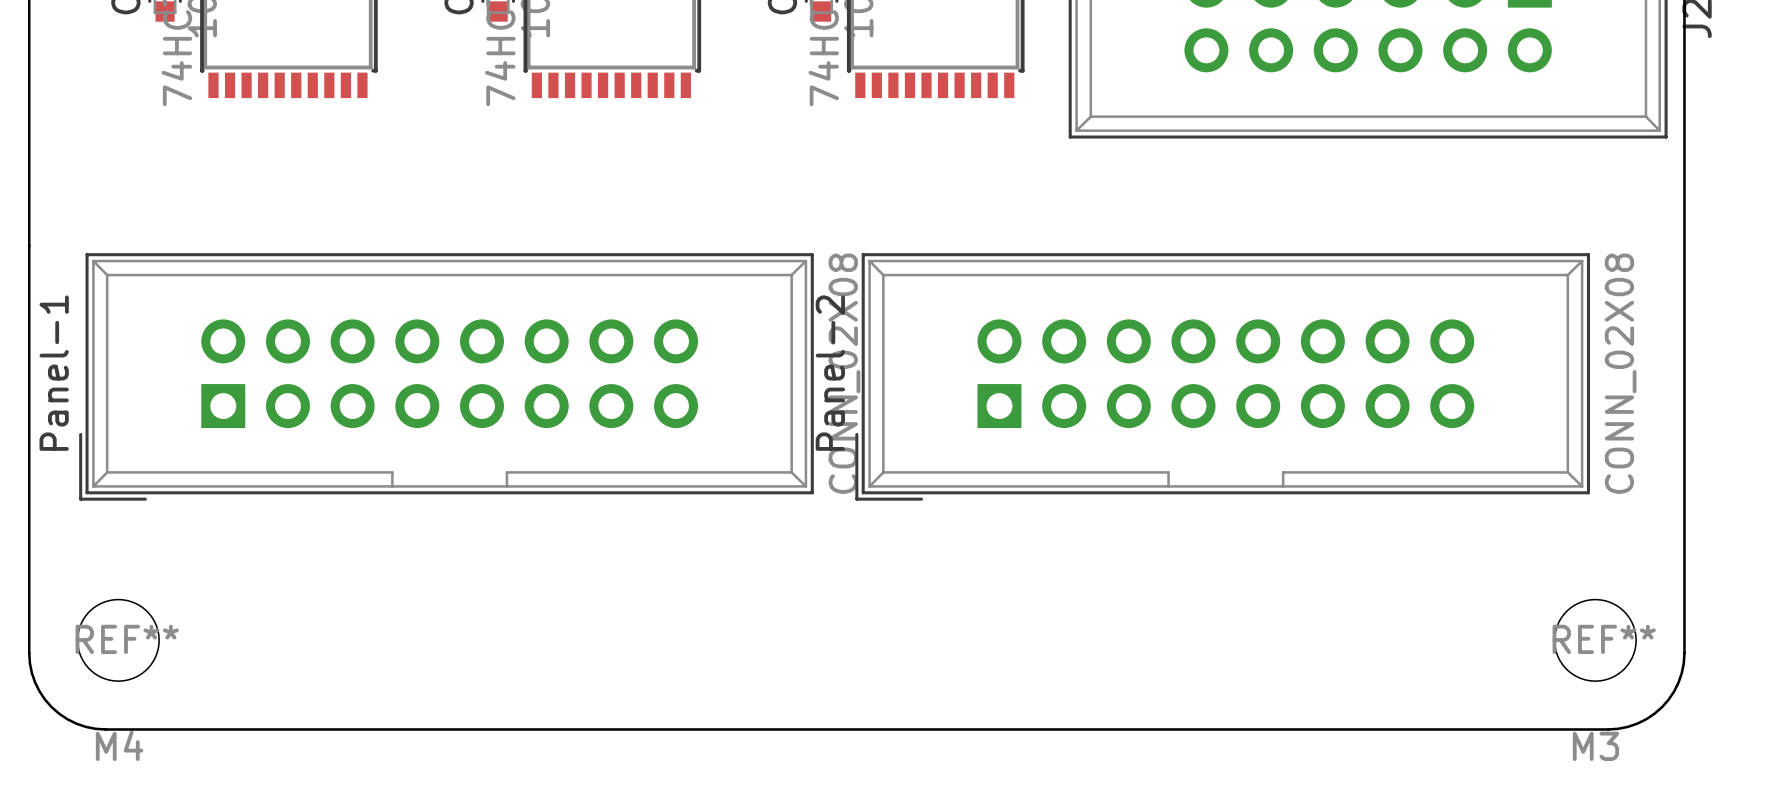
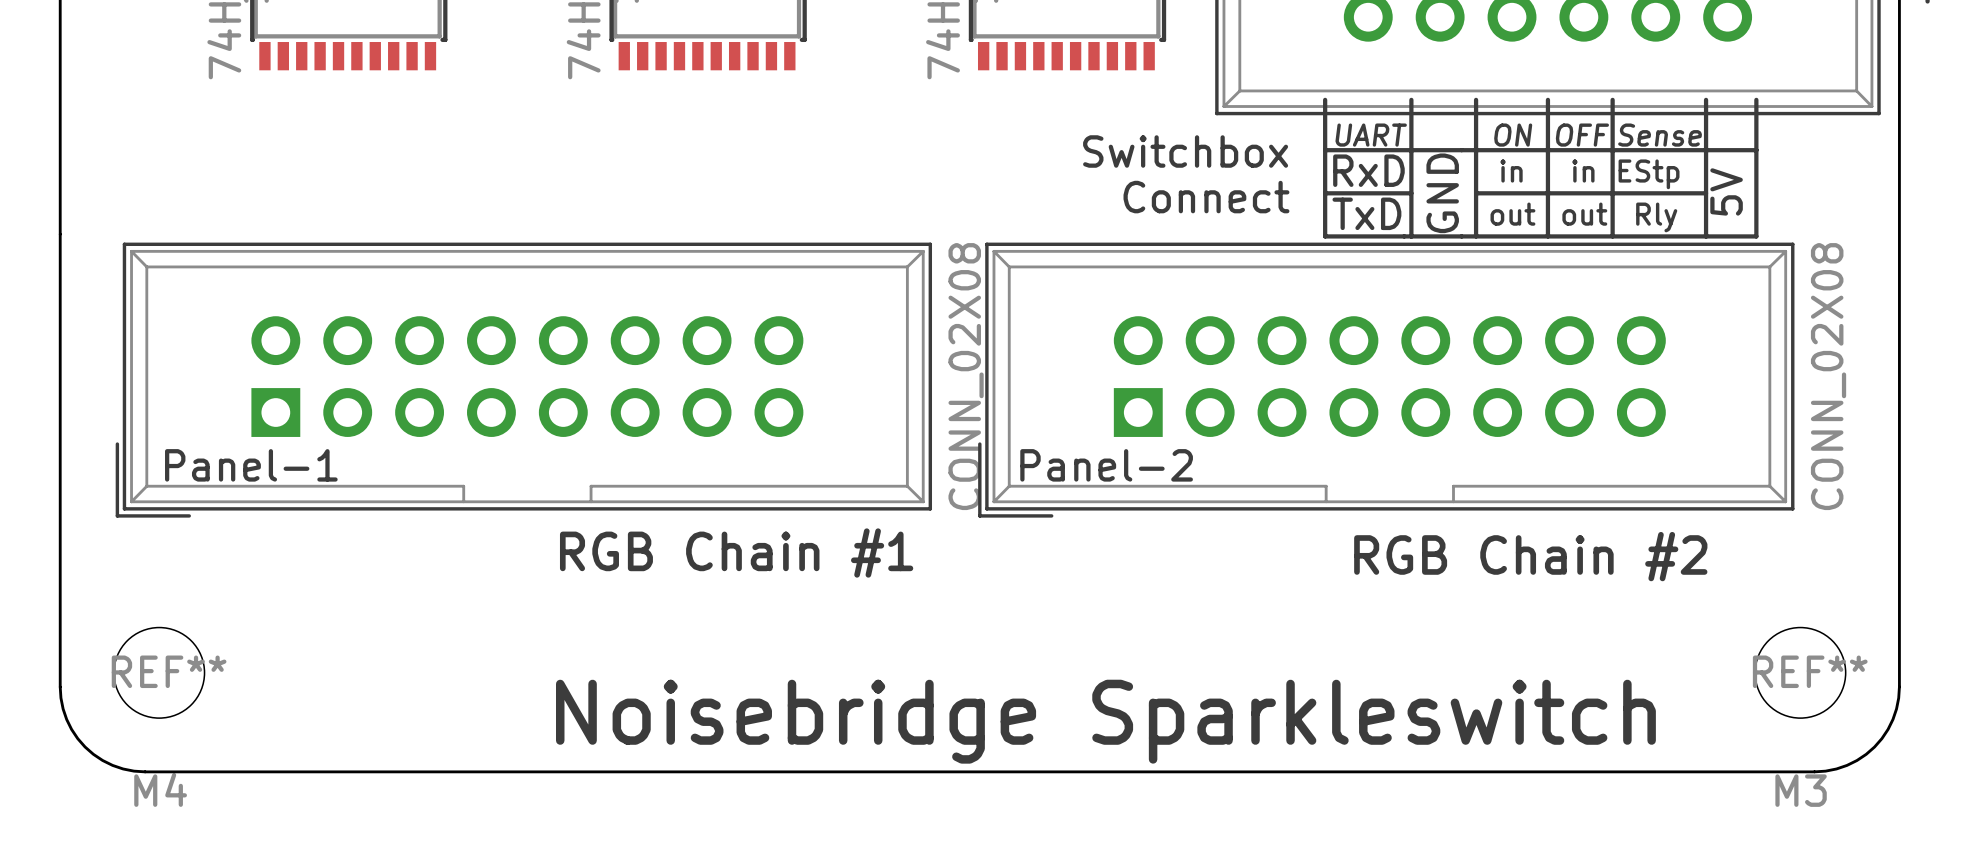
line: none -> (1325, 99) (1325, 236) (1756, 236) (1756, 99)
line: none -> (1411, 99) (1411, 236)
line: none -> (1476, 99) (1476, 236)
line: none -> (1547, 99) (1547, 236)
line: none -> (1612, 99) (1612, 236)
line: none -> (1706, 99) (1706, 236)
text: none -> UART (1371, 135)
text: none -> ON (1513, 135)
text: none -> OFF (1582, 135)
text: none -> Sense (1660, 135)
line: none -> (1325, 150) (1756, 150)
text: none -> Switchbox (1185, 151)
text: none -> RxD (1368, 170)
text: none -> in (1511, 171)
text: none -> in (1583, 171)
text: none -> EStp (1649, 174)
text: none -> 5V (1726, 191)
line: none -> (1325, 193) (1411, 193)
text: none -> GND (1442, 193)
line: none -> (1476, 193) (1706, 193)
text: none -> Connect (1206, 197)
text: none -> TxD (1366, 213)
text: none -> out (1512, 214)
text: none -> out (1584, 214)
text: none -> Rly (1656, 217)
Panel-1 name rotation: 0° (54, 373) -> 90° clockwise (251, 465)
Panel-2 name rotation: 0° (830, 373) -> 90° clockwise (1106, 465)
text: none -> RGB Chain #1 (736, 553)
text: none -> RGB Chain #2 (1530, 556)
text: none -> Noisebridge Sparkleswitch (1105, 721)

